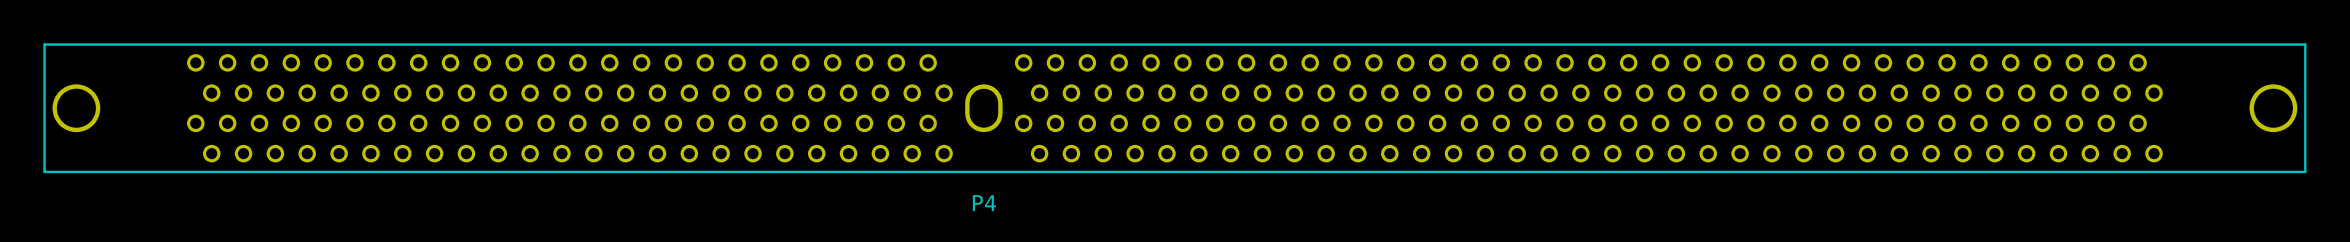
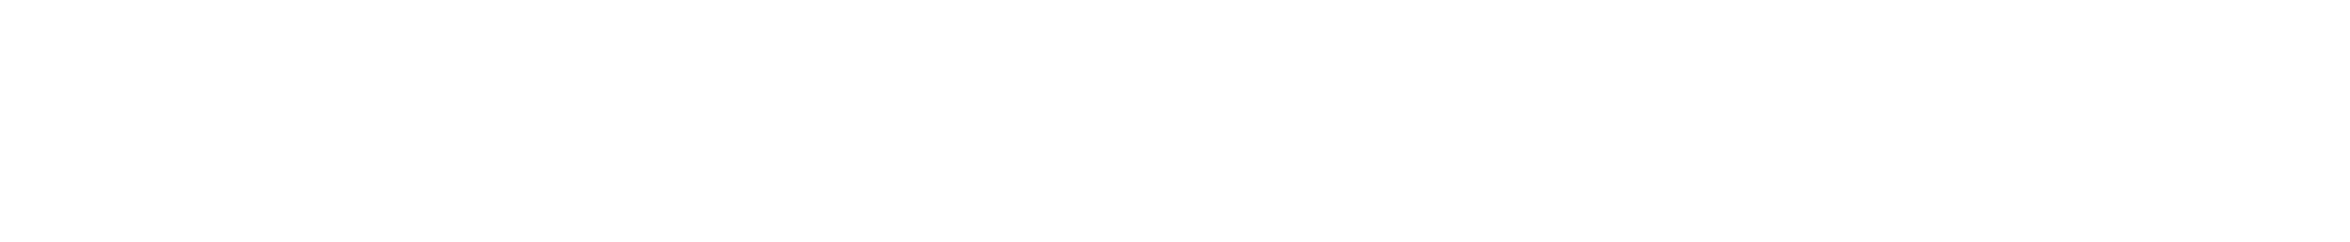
P4: (1174, 108) -> none

